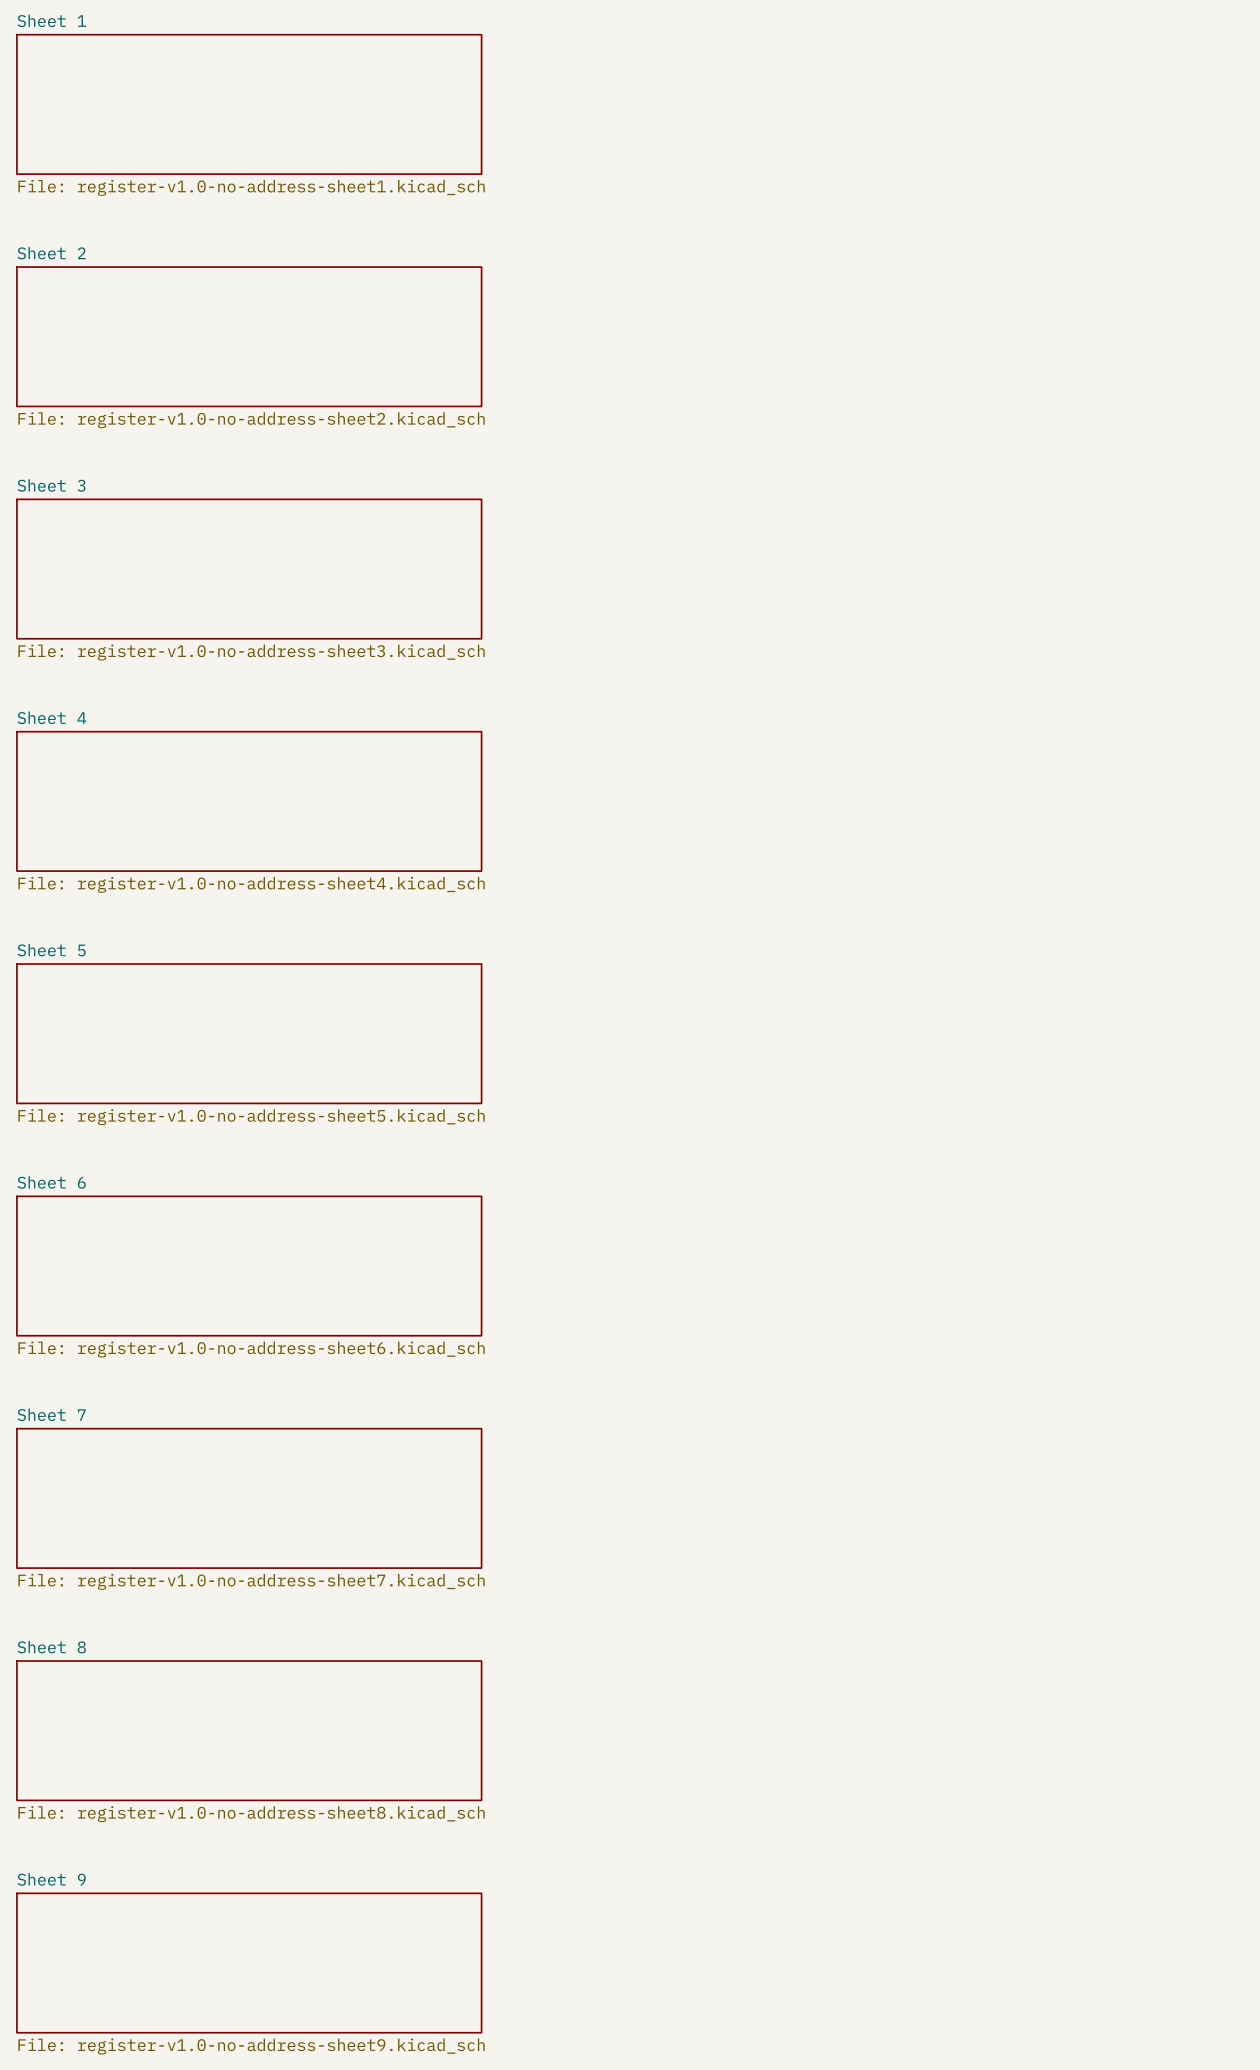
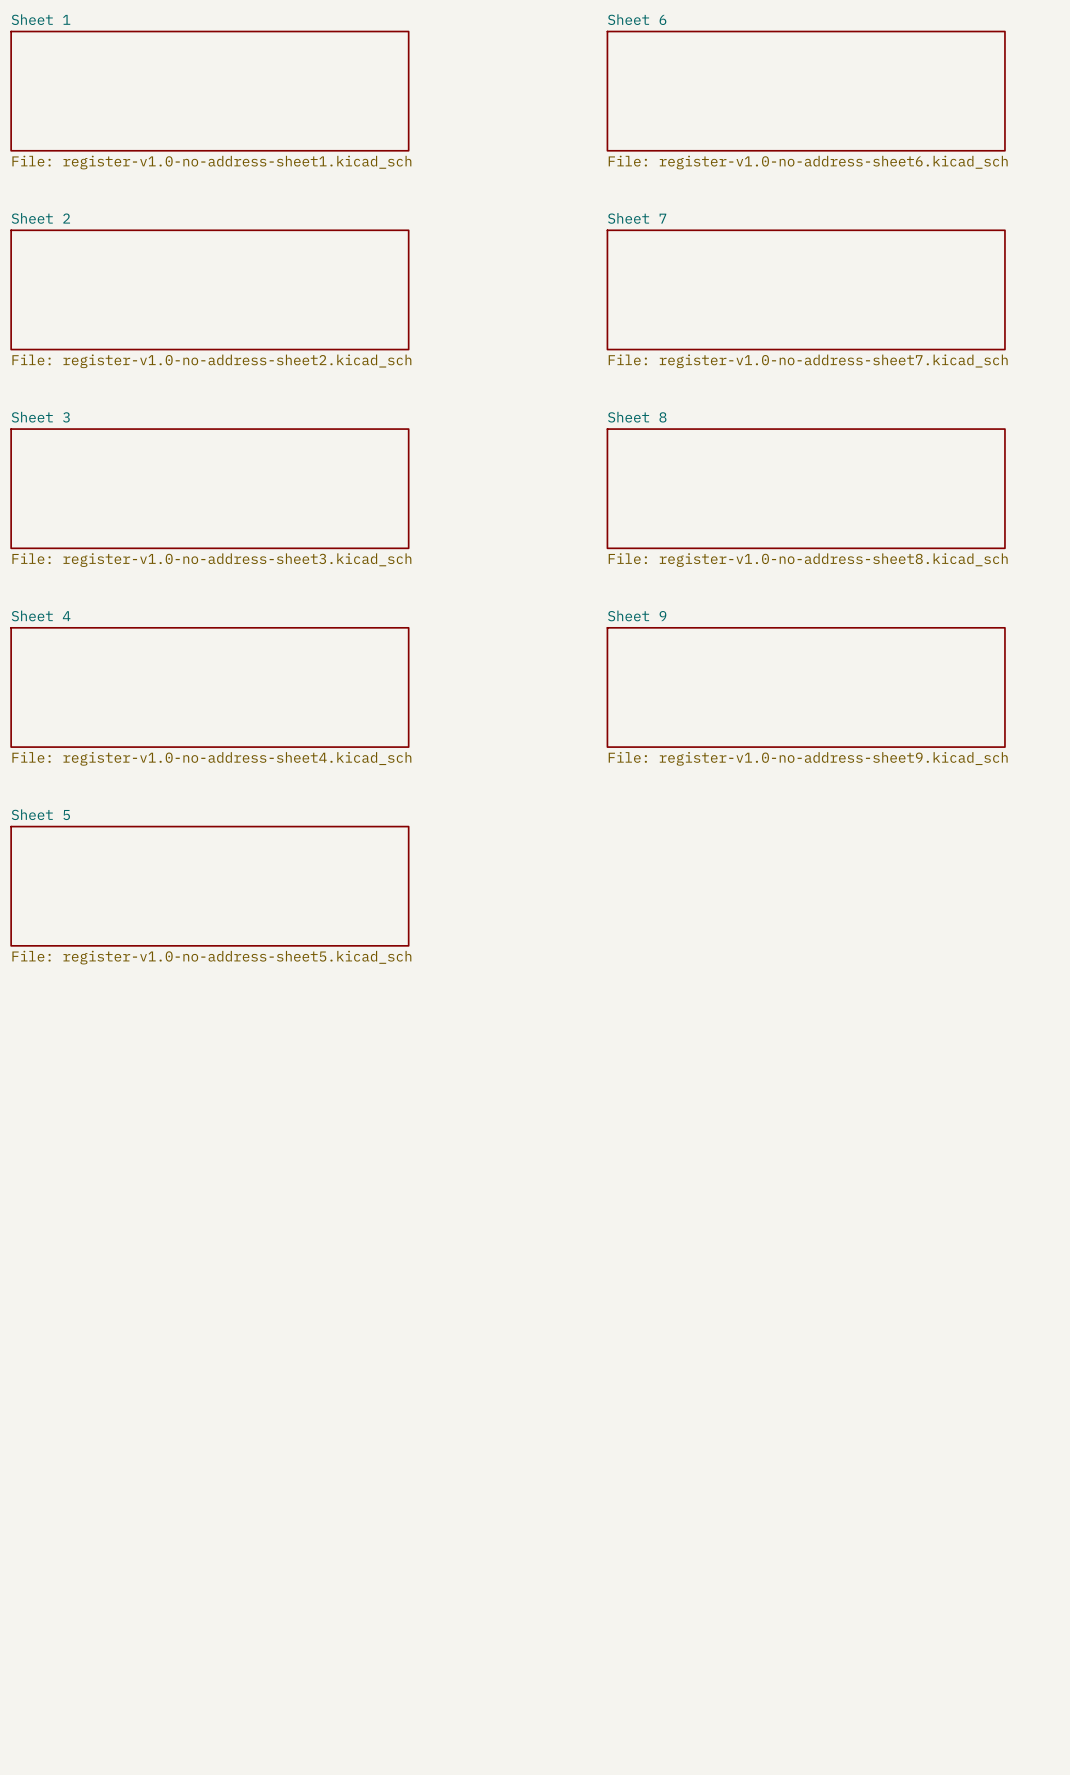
sheet Sheet 6 position: (249, 1266) -> (806, 91)
sheet Sheet 7 position: (249, 1498) -> (806, 289)
sheet Sheet 8 position: (249, 1730) -> (806, 488)
sheet Sheet 9 position: (249, 1963) -> (806, 687)

